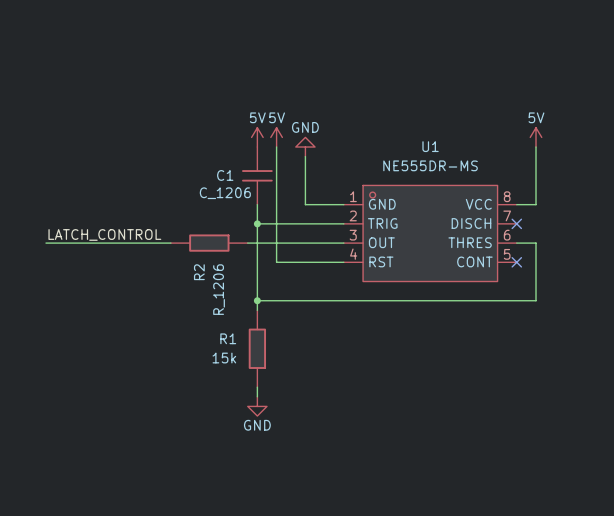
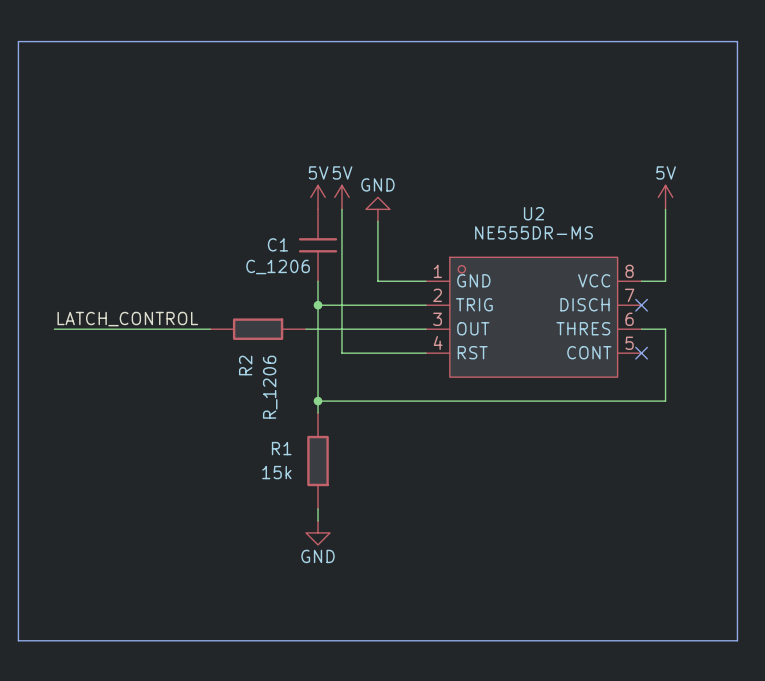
line: none -> (18, 41) (737, 41) (737, 640) (18, 640) (18, 41)
U1 name: U1 (430, 146) -> U2 (534, 213)

